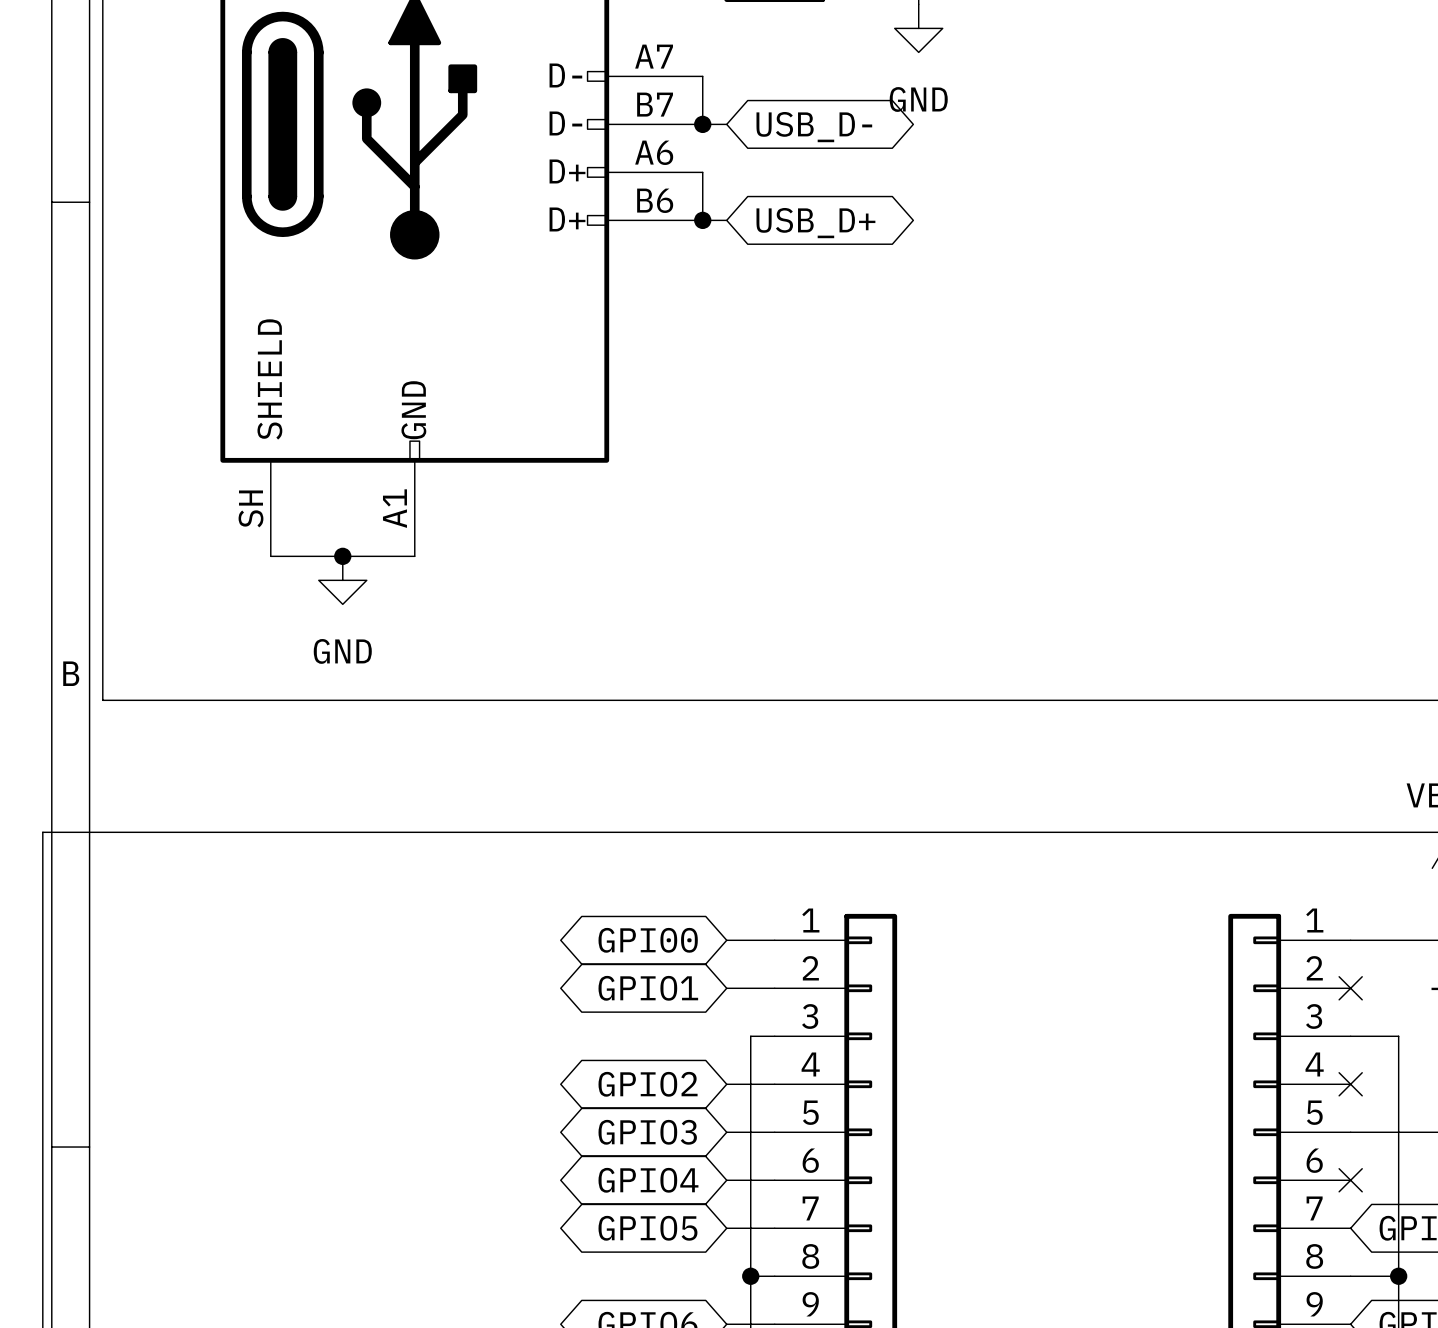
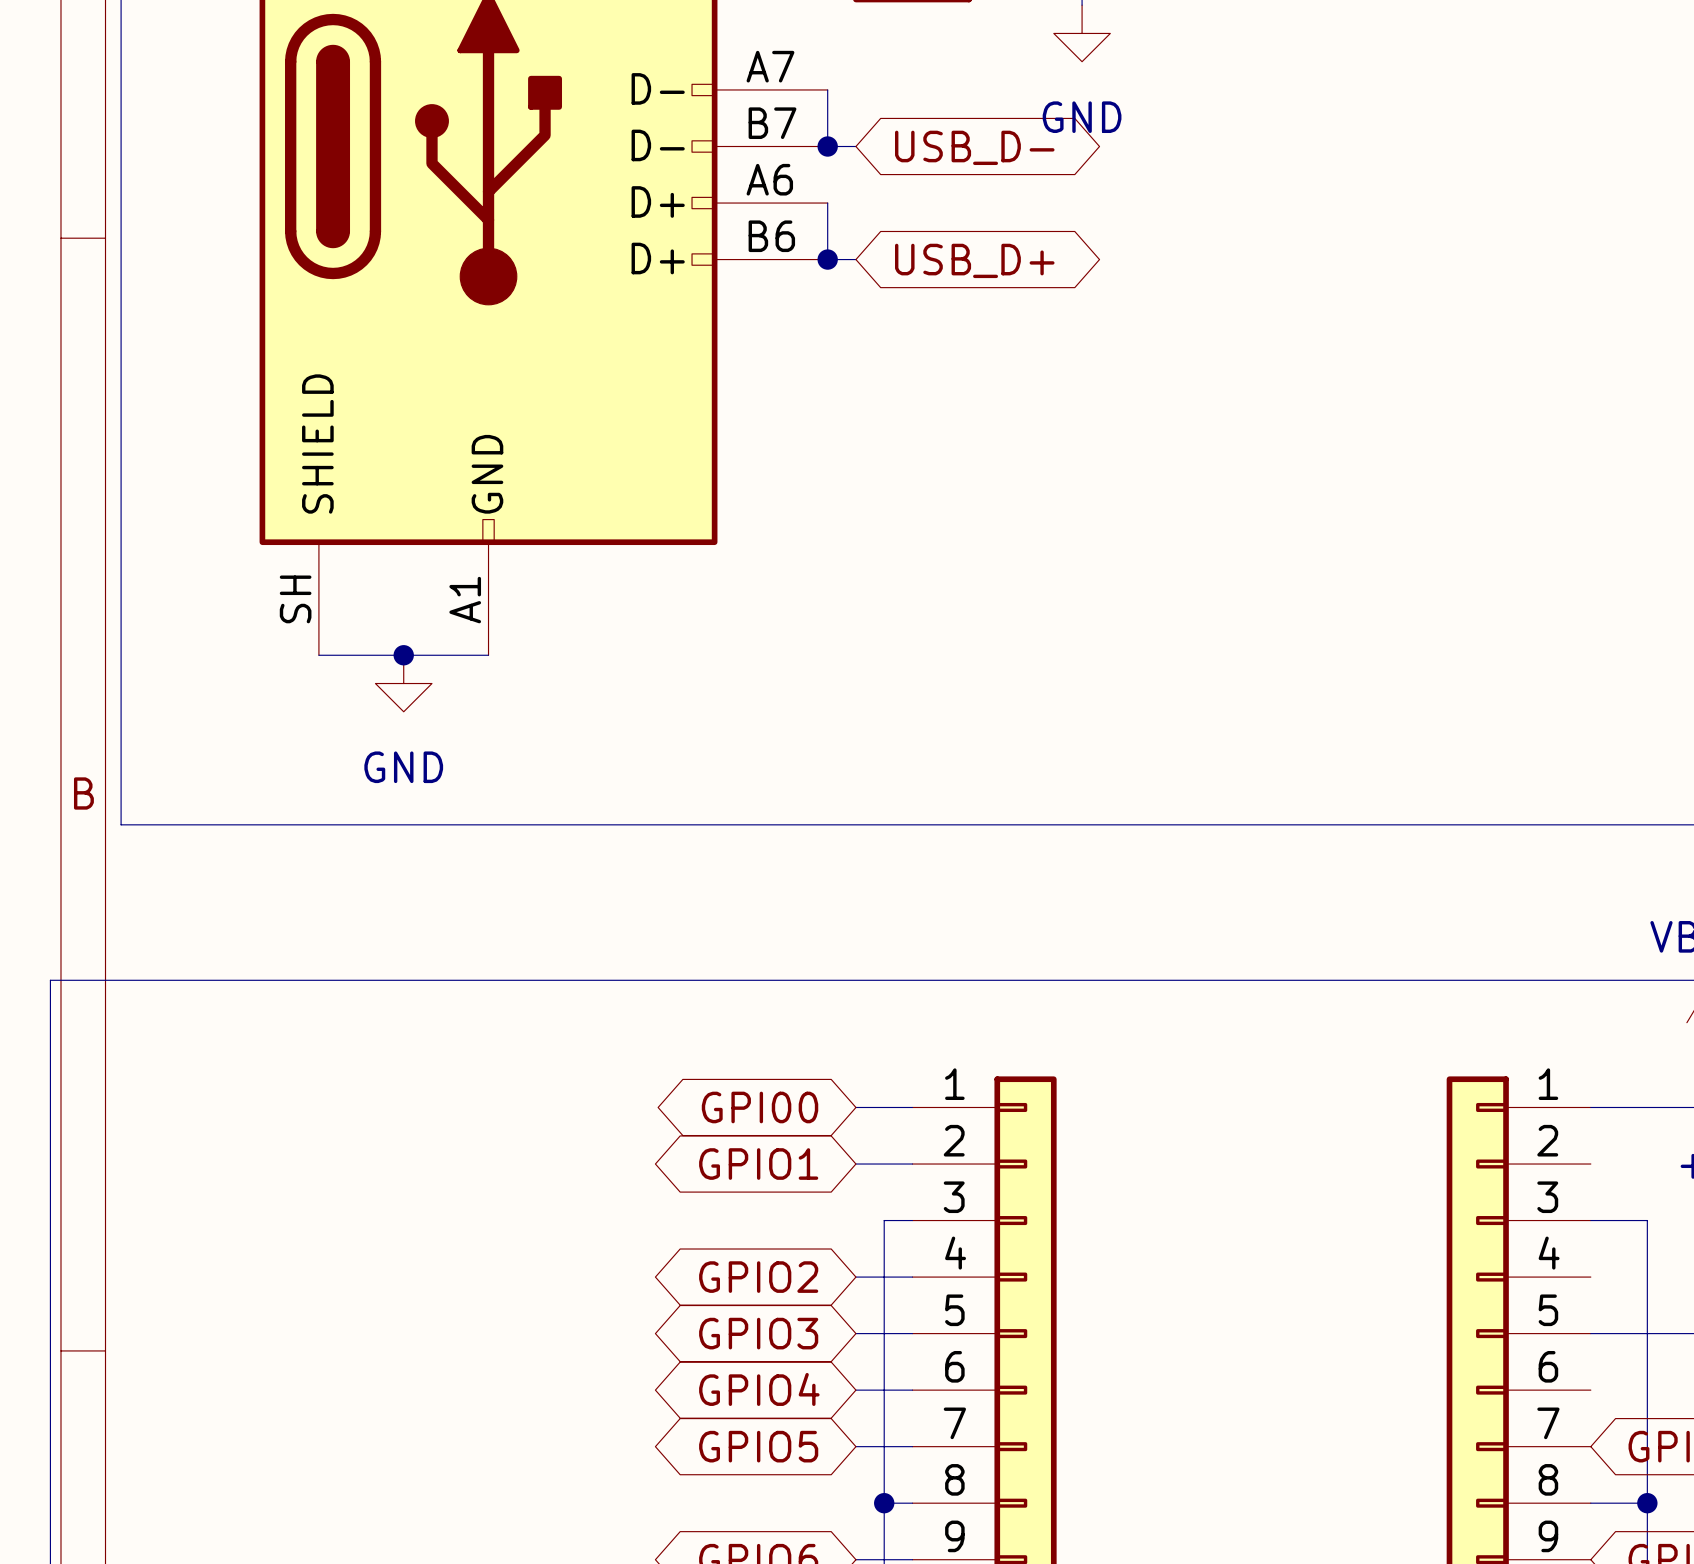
no-connect mark: (1350, 988) -> none
no-connect mark: (1350, 1084) -> none
no-connect mark: (1350, 1180) -> none

